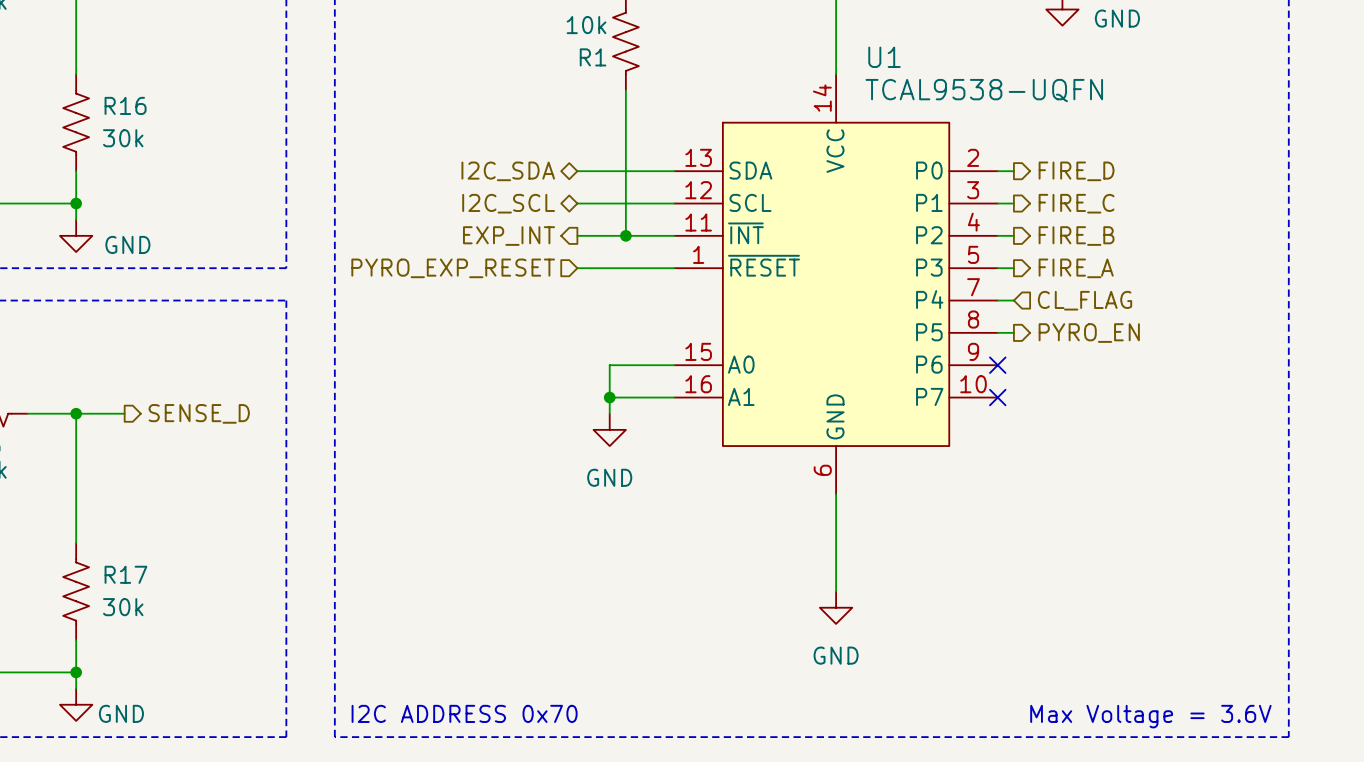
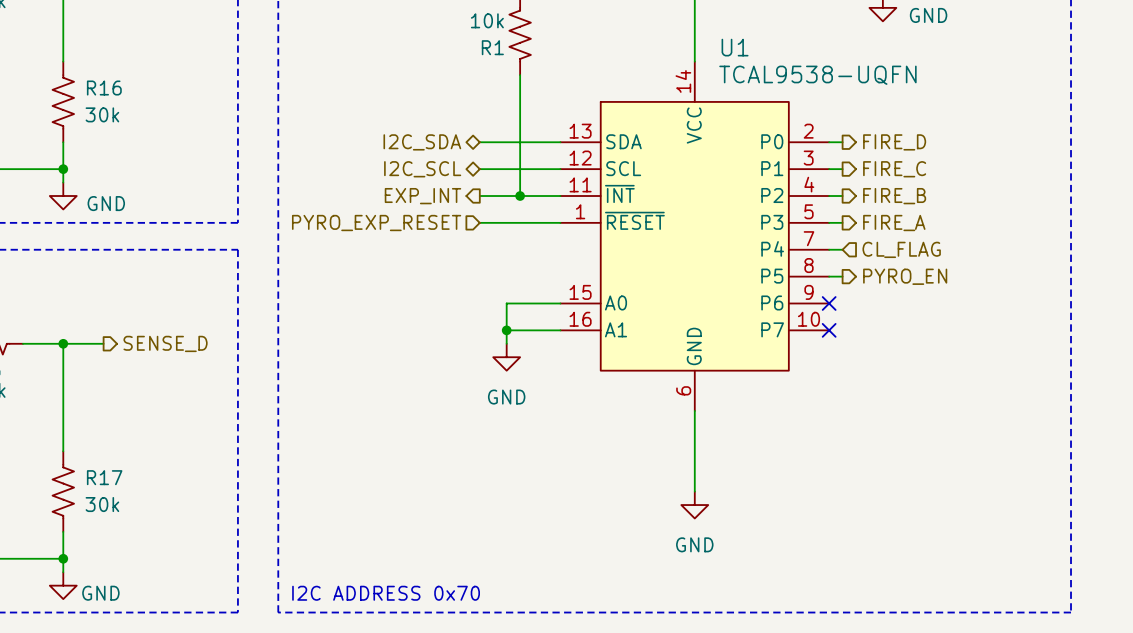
text: Max Voltage = 3.6V (1150, 716) -> none

